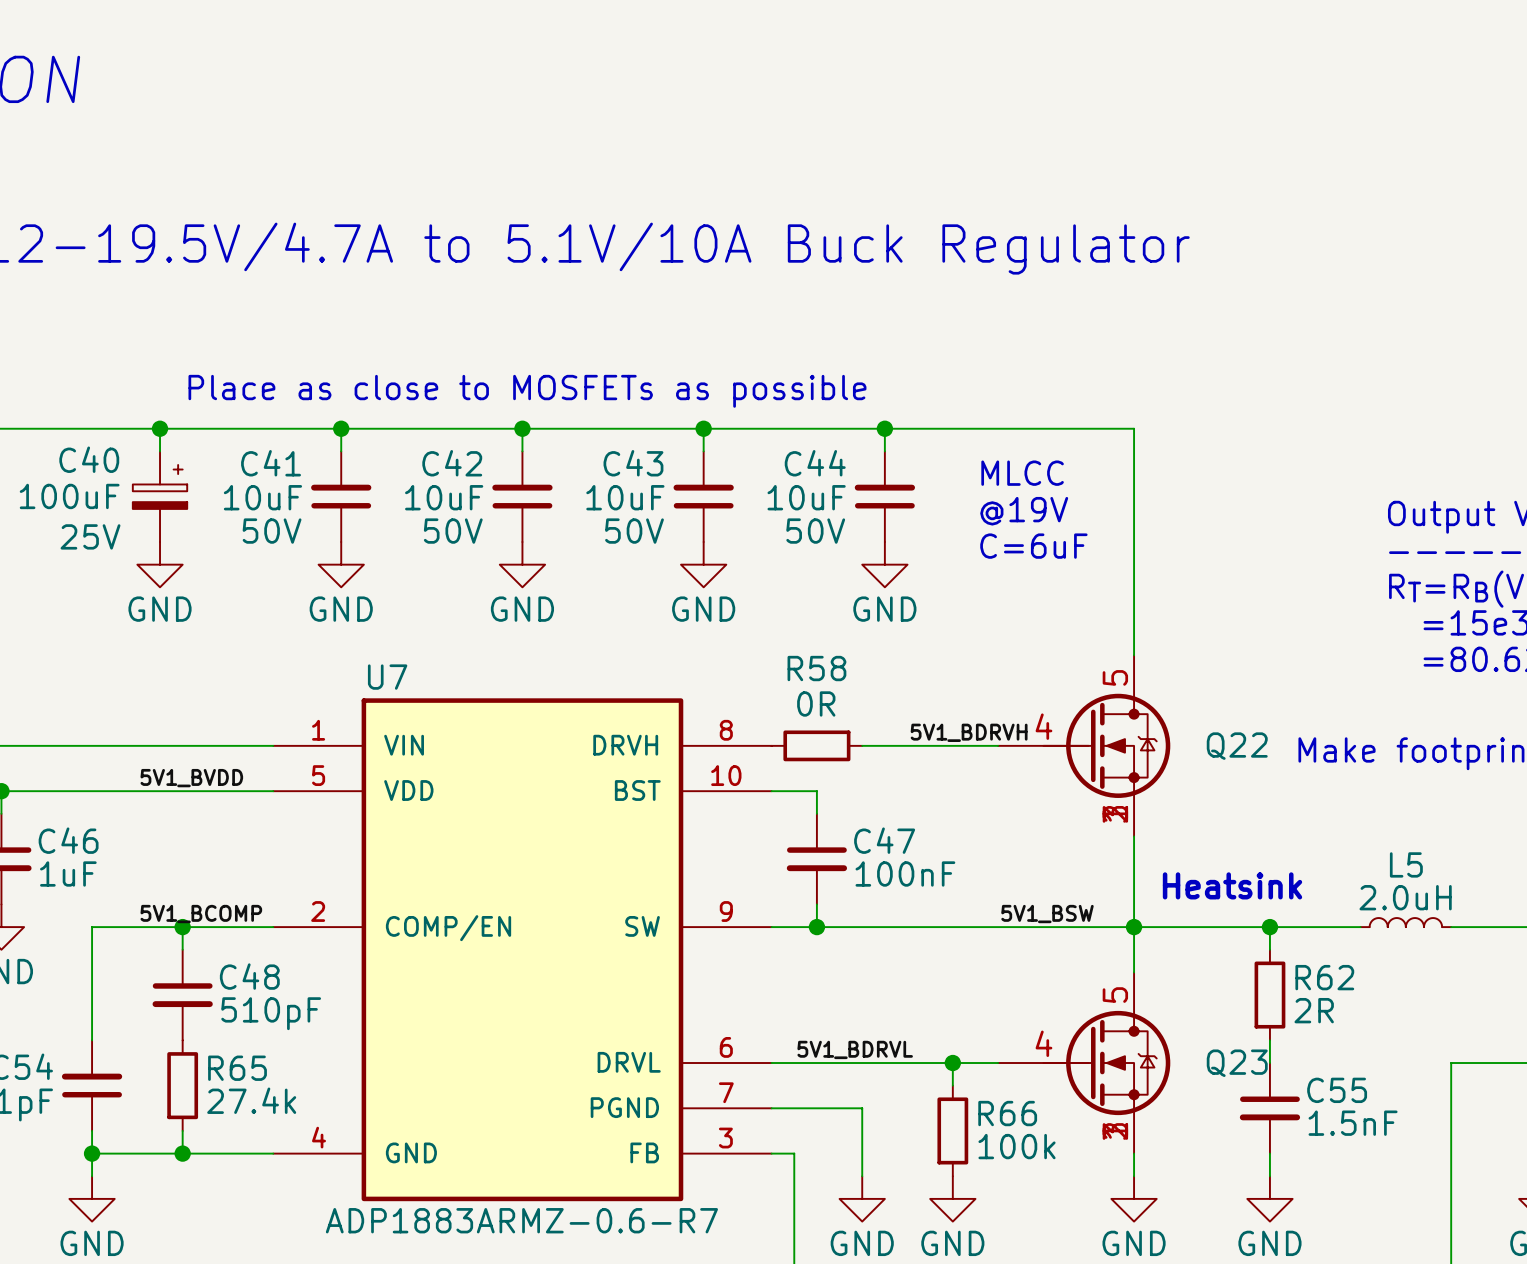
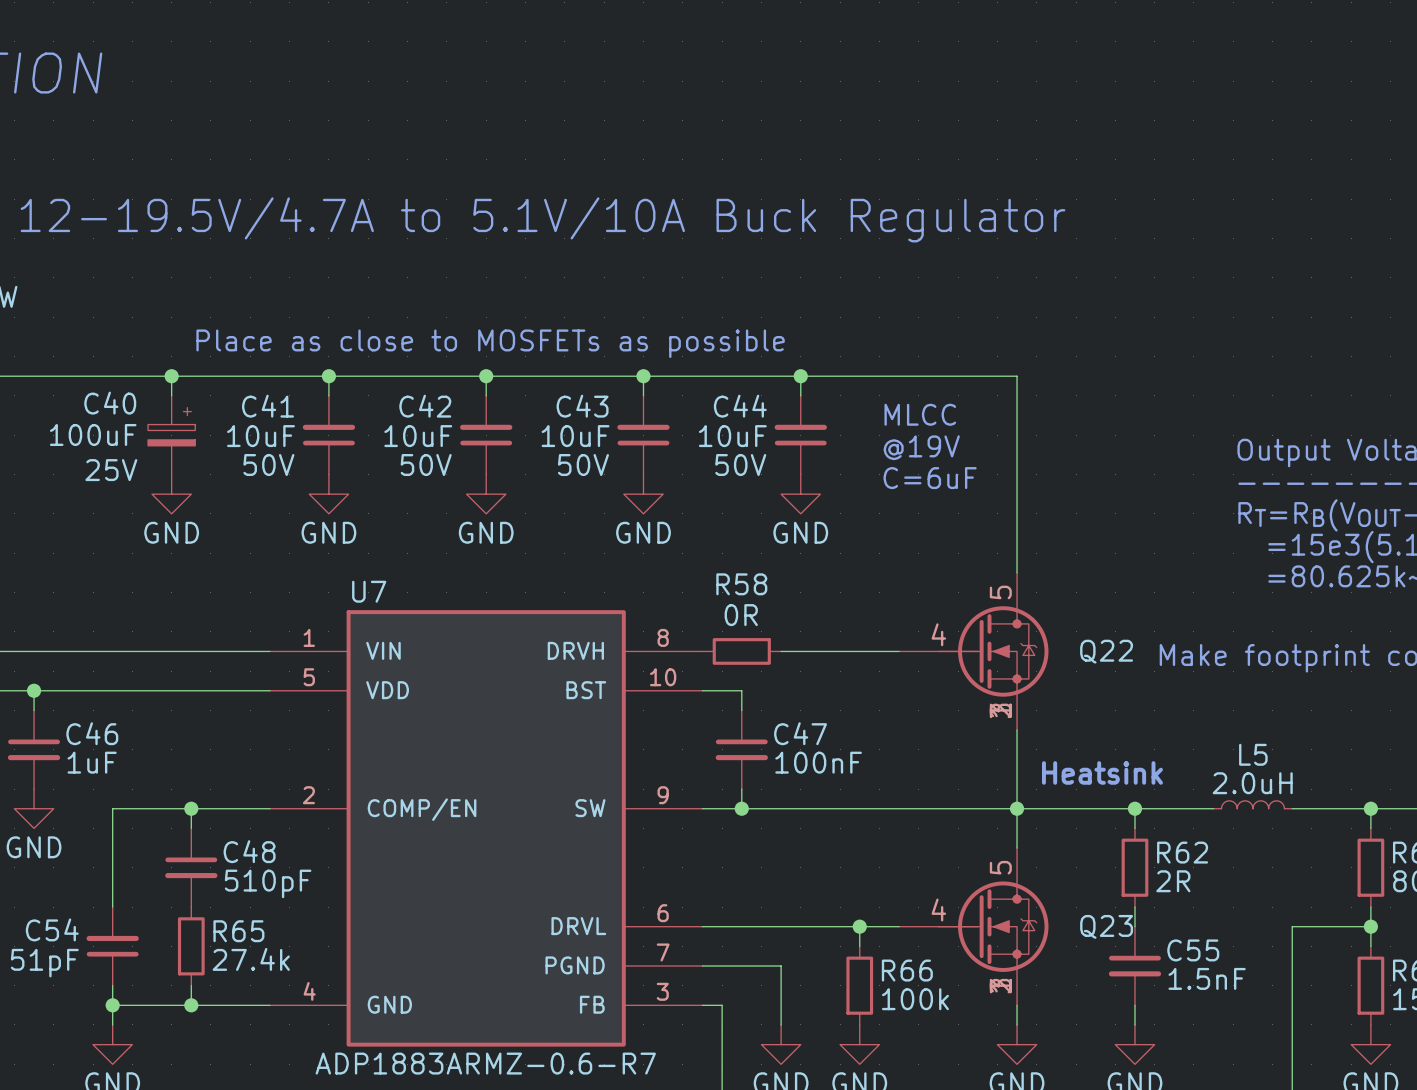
label: 5V1_BDRVH (969, 732) -> none
label: 5V1_BVDD (191, 778) -> none
label: 5V1_BCOMP (201, 914) -> none
label: 5V1_BSW (1047, 914) -> none
label: 5V1_BDRVL (855, 1049) -> none

